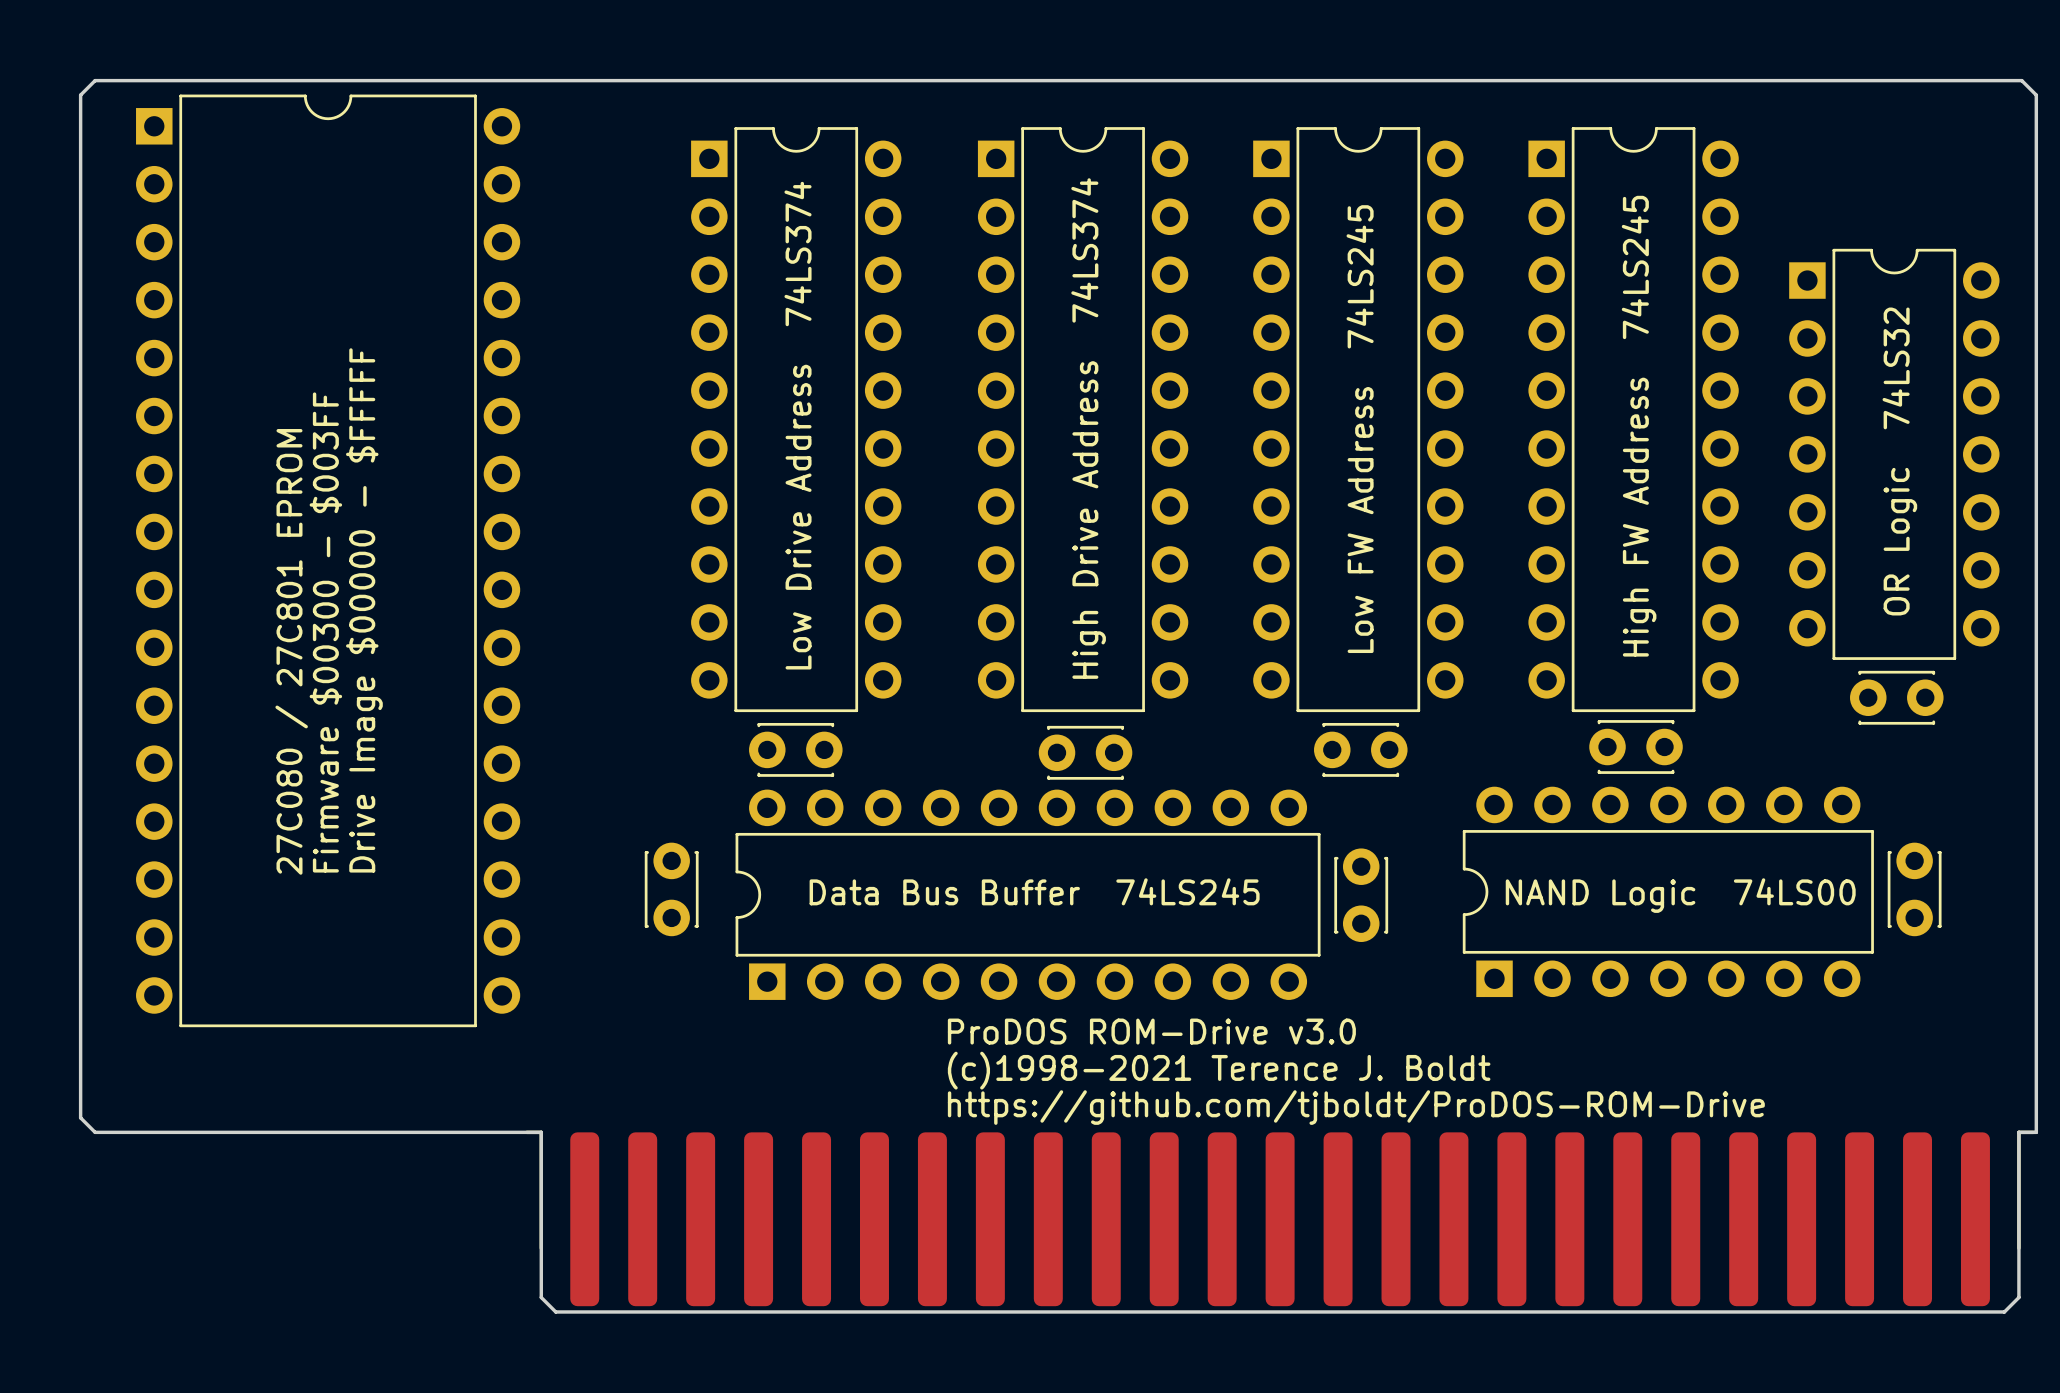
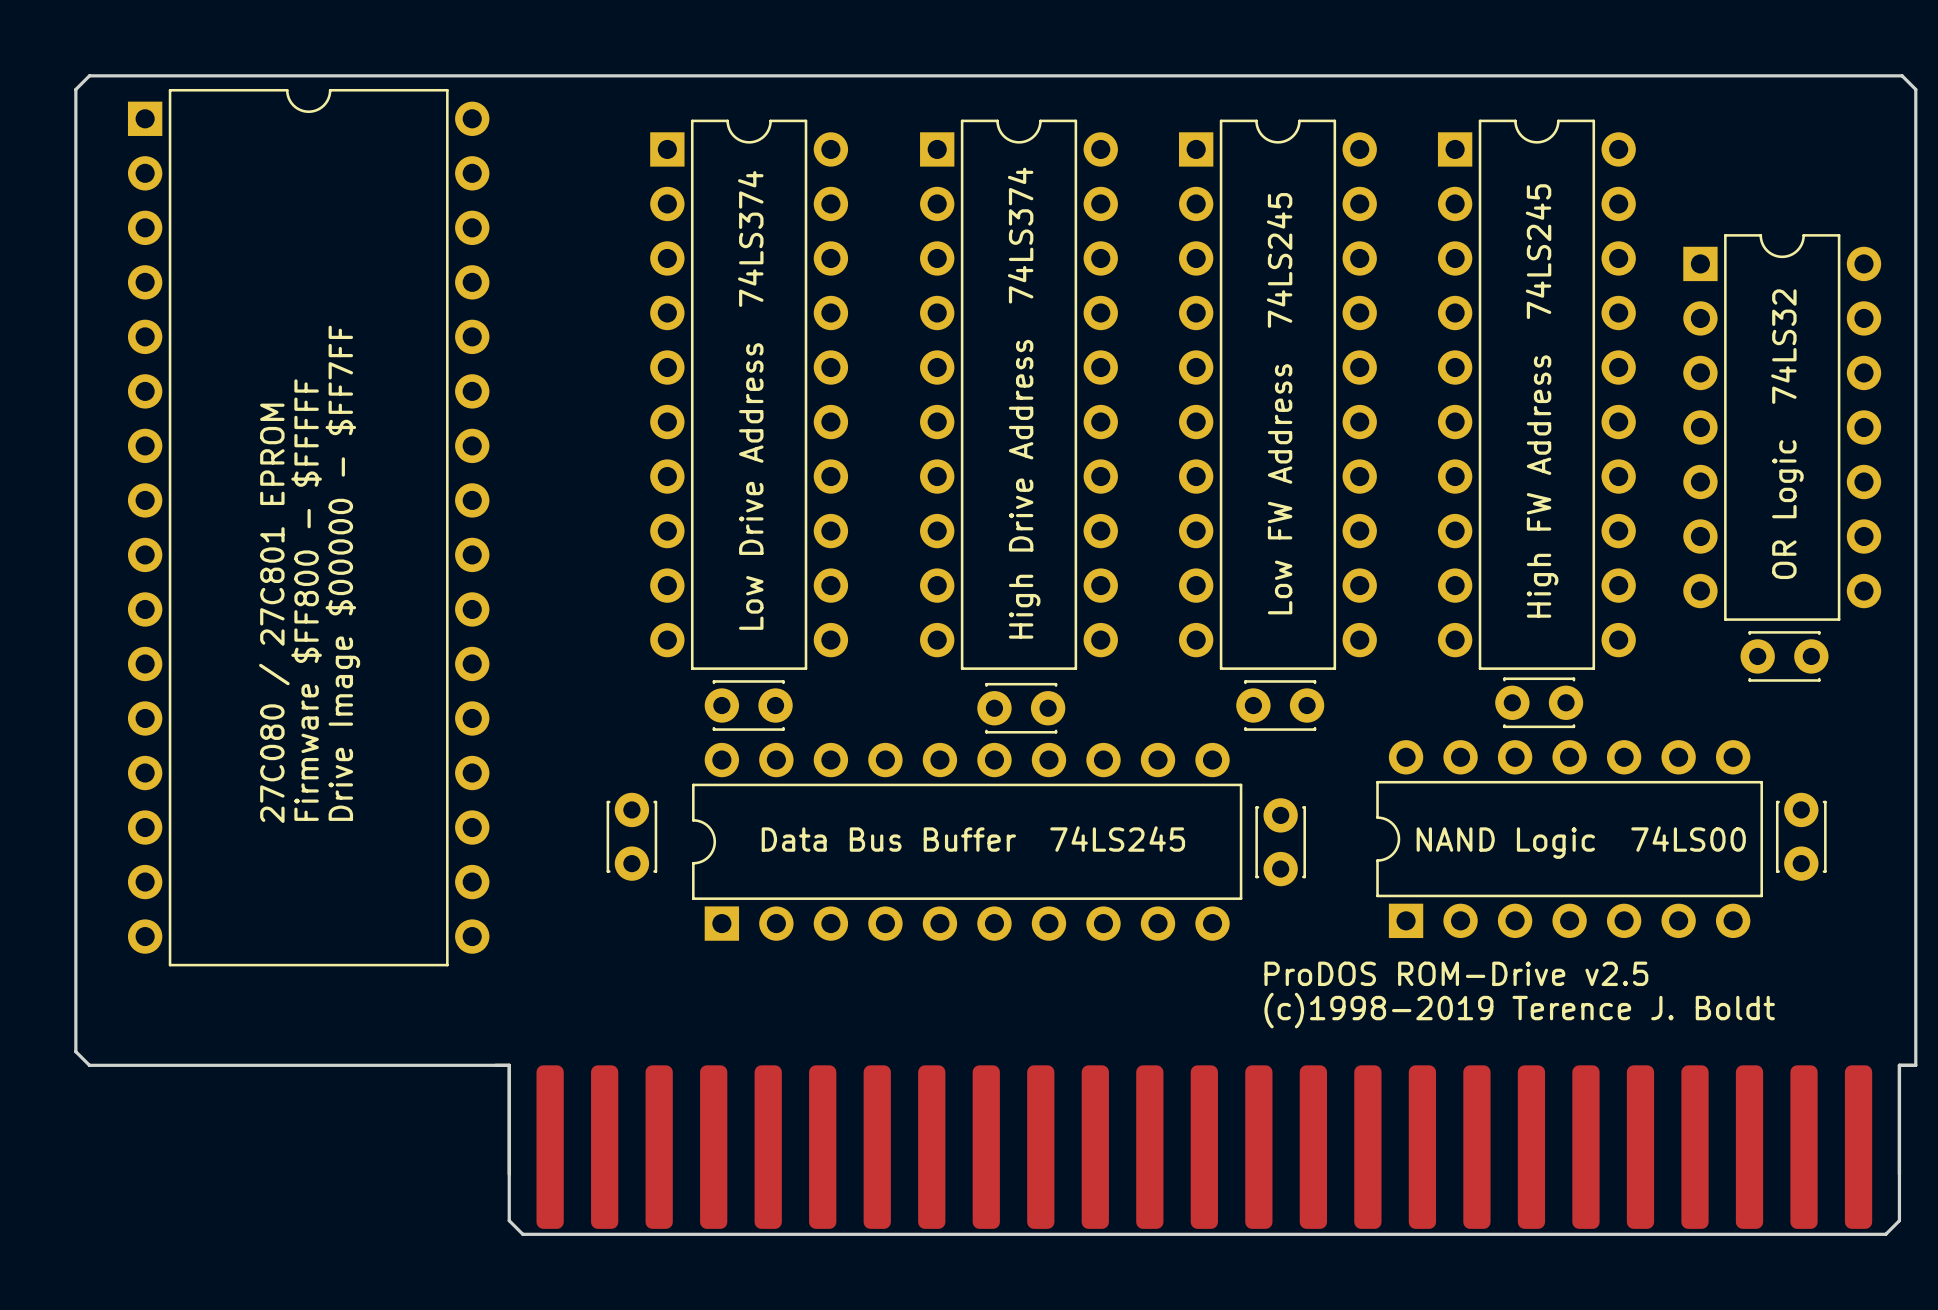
text: Drive Image $00000 - $FFFFF (364, 610) -> Drive Image $00000 - $FF7FF (342, 573)
text: Firmware $00300 - $003FF (325, 632) -> Firmware $FF800 - $FFFFF (306, 600)
text: ProDOS ROM-Drive v3.0 (1151, 1031) -> ProDOS ROM-Drive v2.5 (1456, 973)
text: (c)1998-2021 Terence J. Boldt (1219, 1070) -> (c)1998-2019 Terence J. Boldt (1519, 1010)
text: https://github.com/tjboldt/ProDOS-ROM-Drive (1356, 1107) -> none

